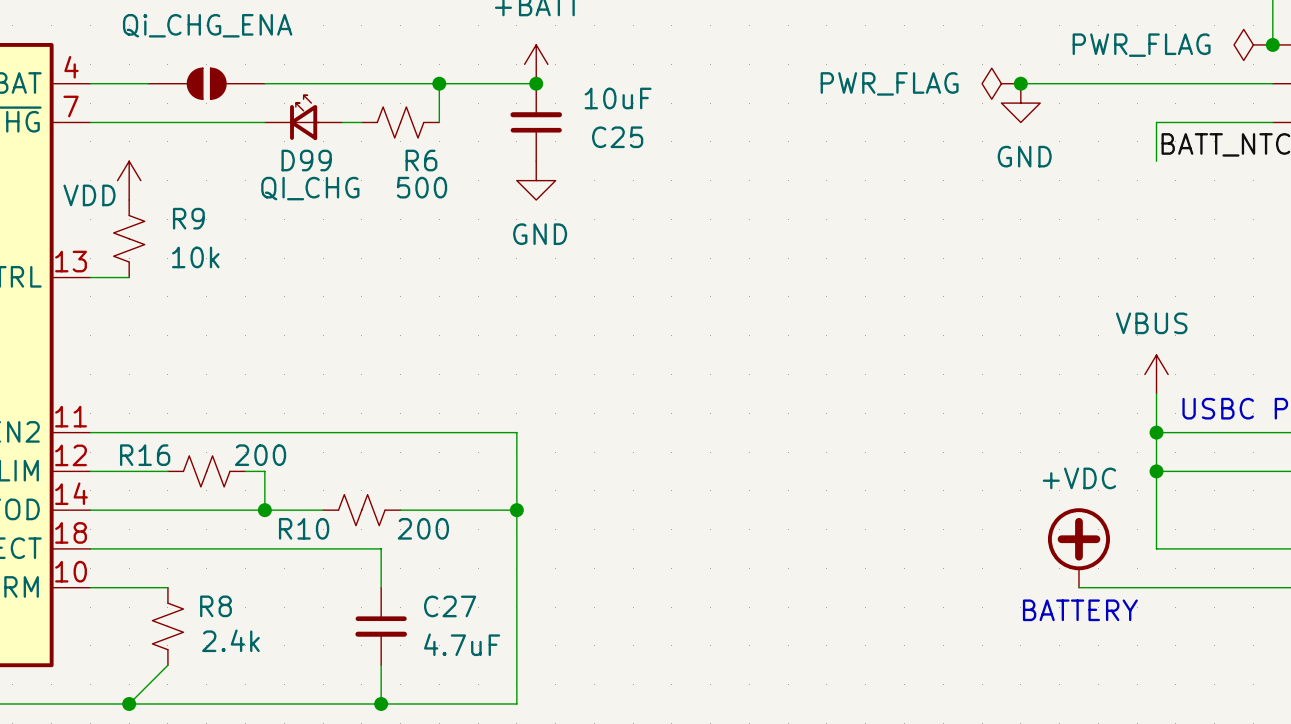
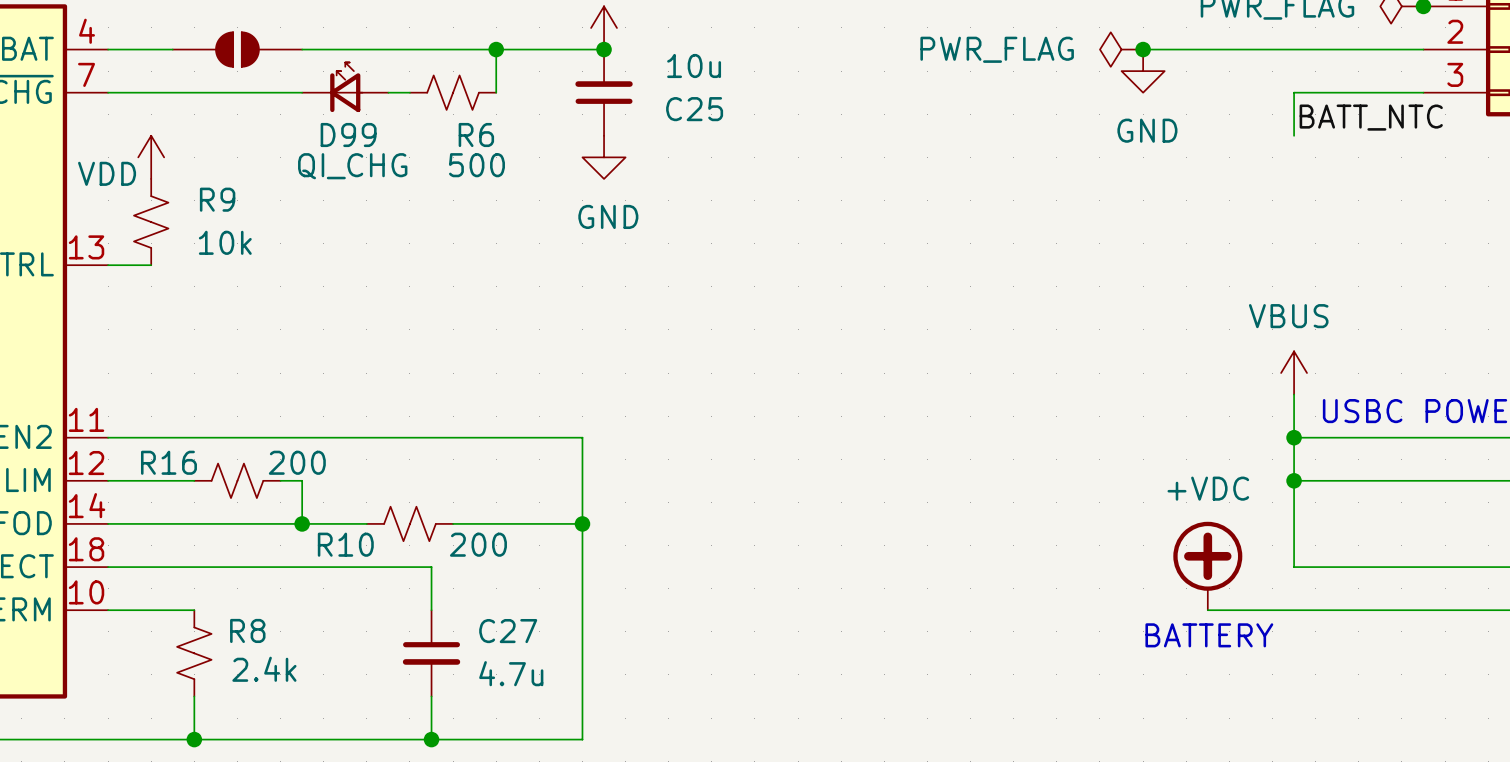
C25 value: 10uF (618, 98) -> 10u (694, 66)
C27 value: 4.7uF (462, 644) -> 4.7u (511, 673)
wire: (167, 665) (129, 703) -> (194, 696) (194, 739)
junction position: (129, 703) -> (194, 739)

